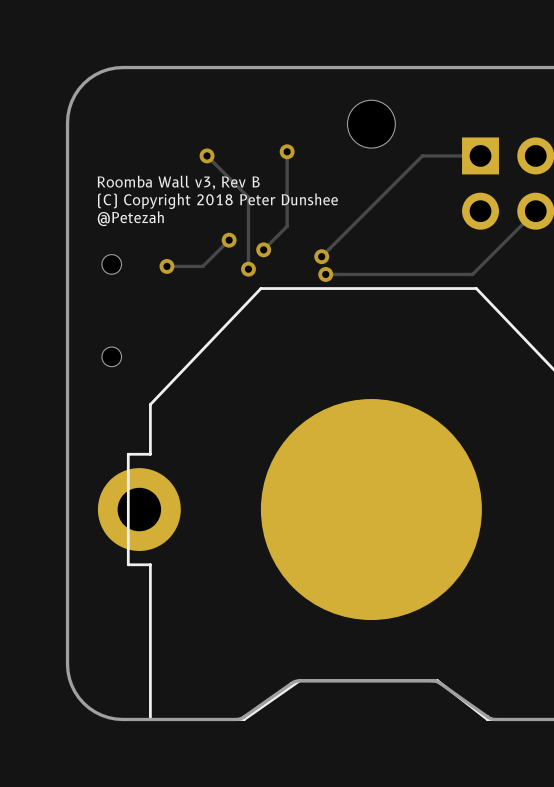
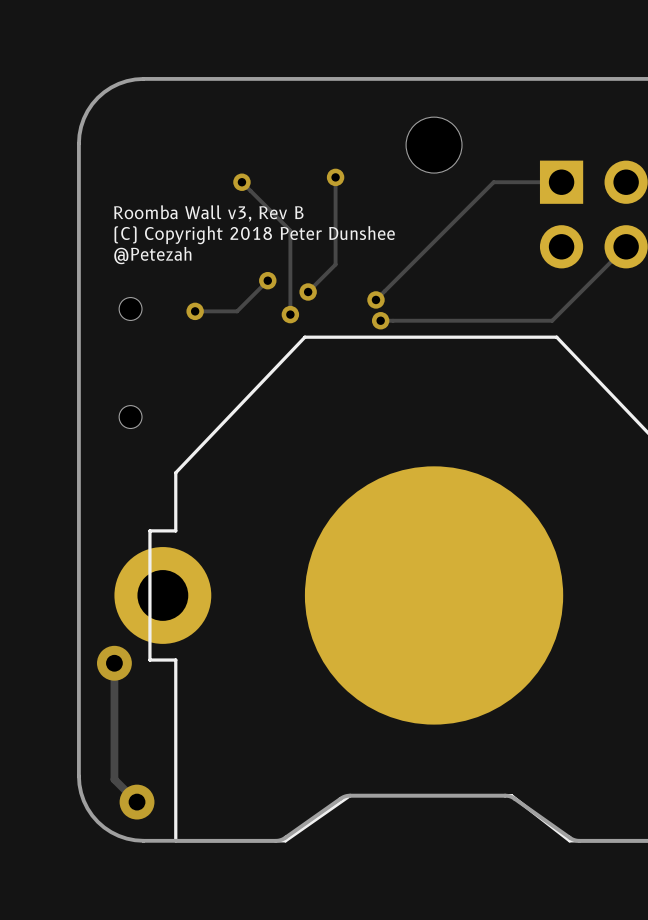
track: none -> (114, 663) (114, 779) (137, 802)
via: none -> (114, 663)
via: none -> (137, 802)

